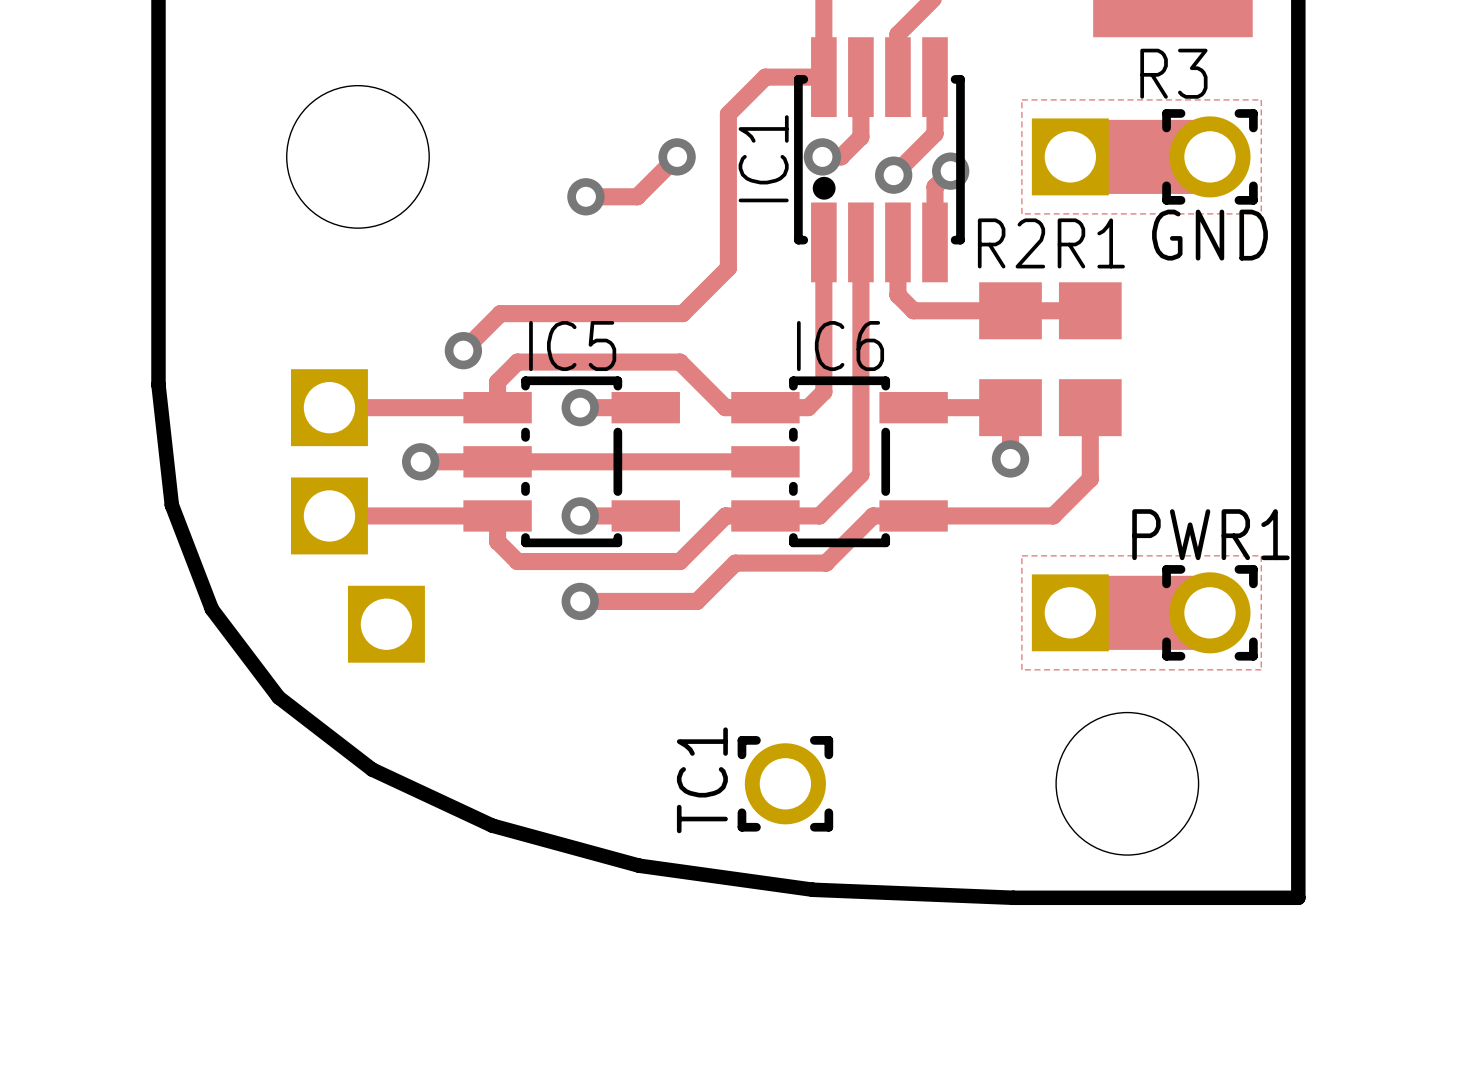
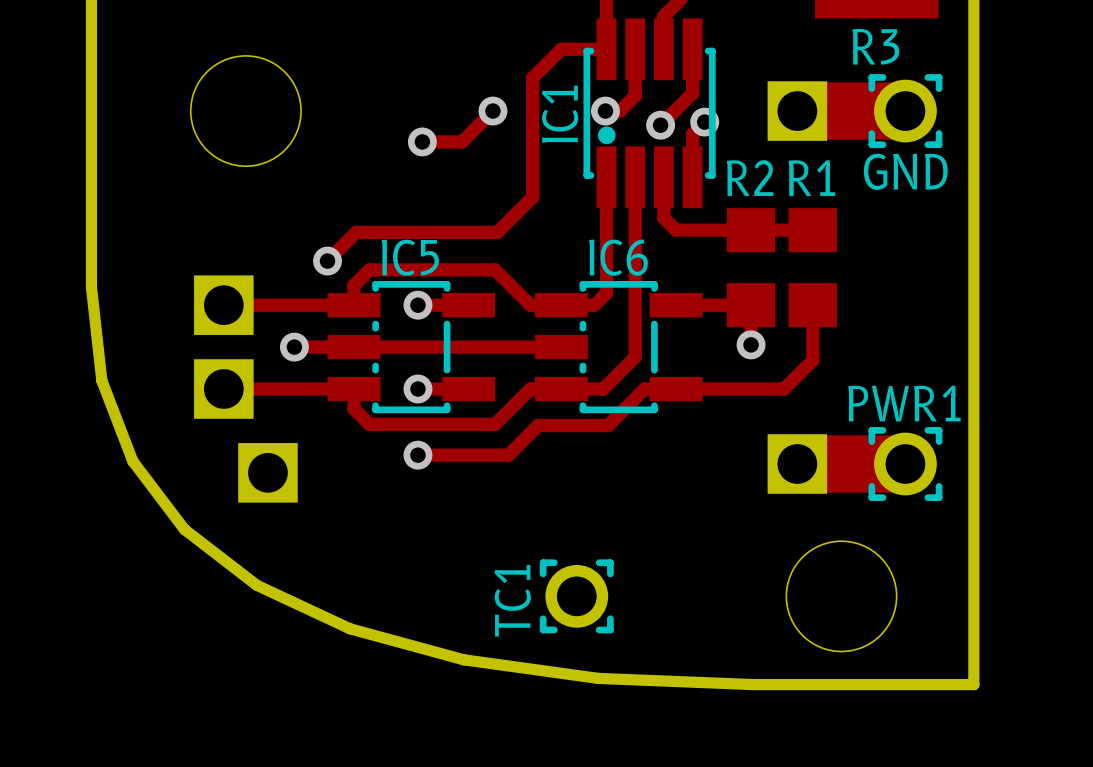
zone outline: (1021, 99) (1261, 99) (1261, 213) (1021, 213) (1021, 99) -> none
zone outline: (1021, 555) (1021, 669) (1261, 669) (1261, 555) (1021, 555) -> none

